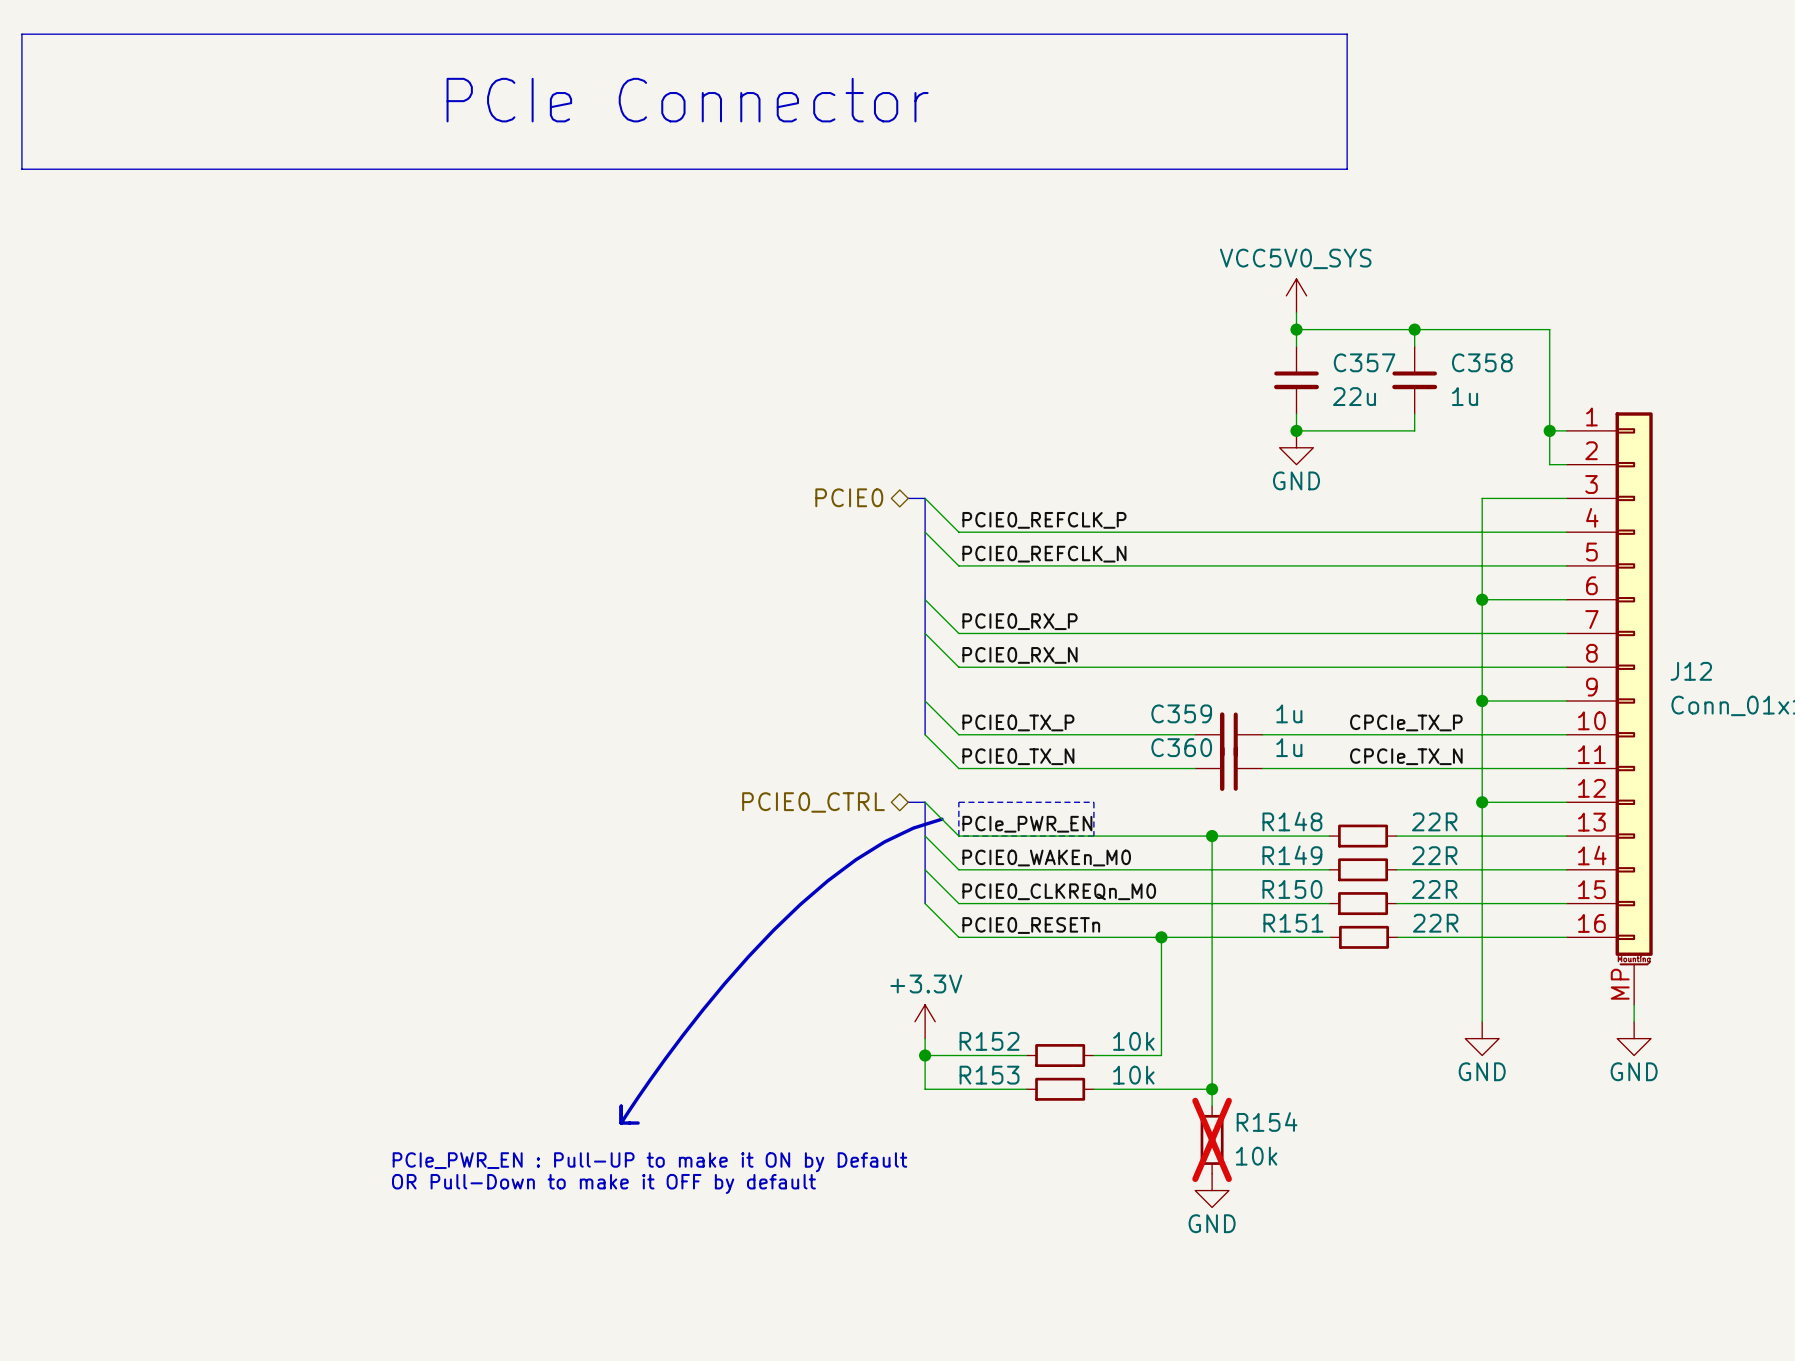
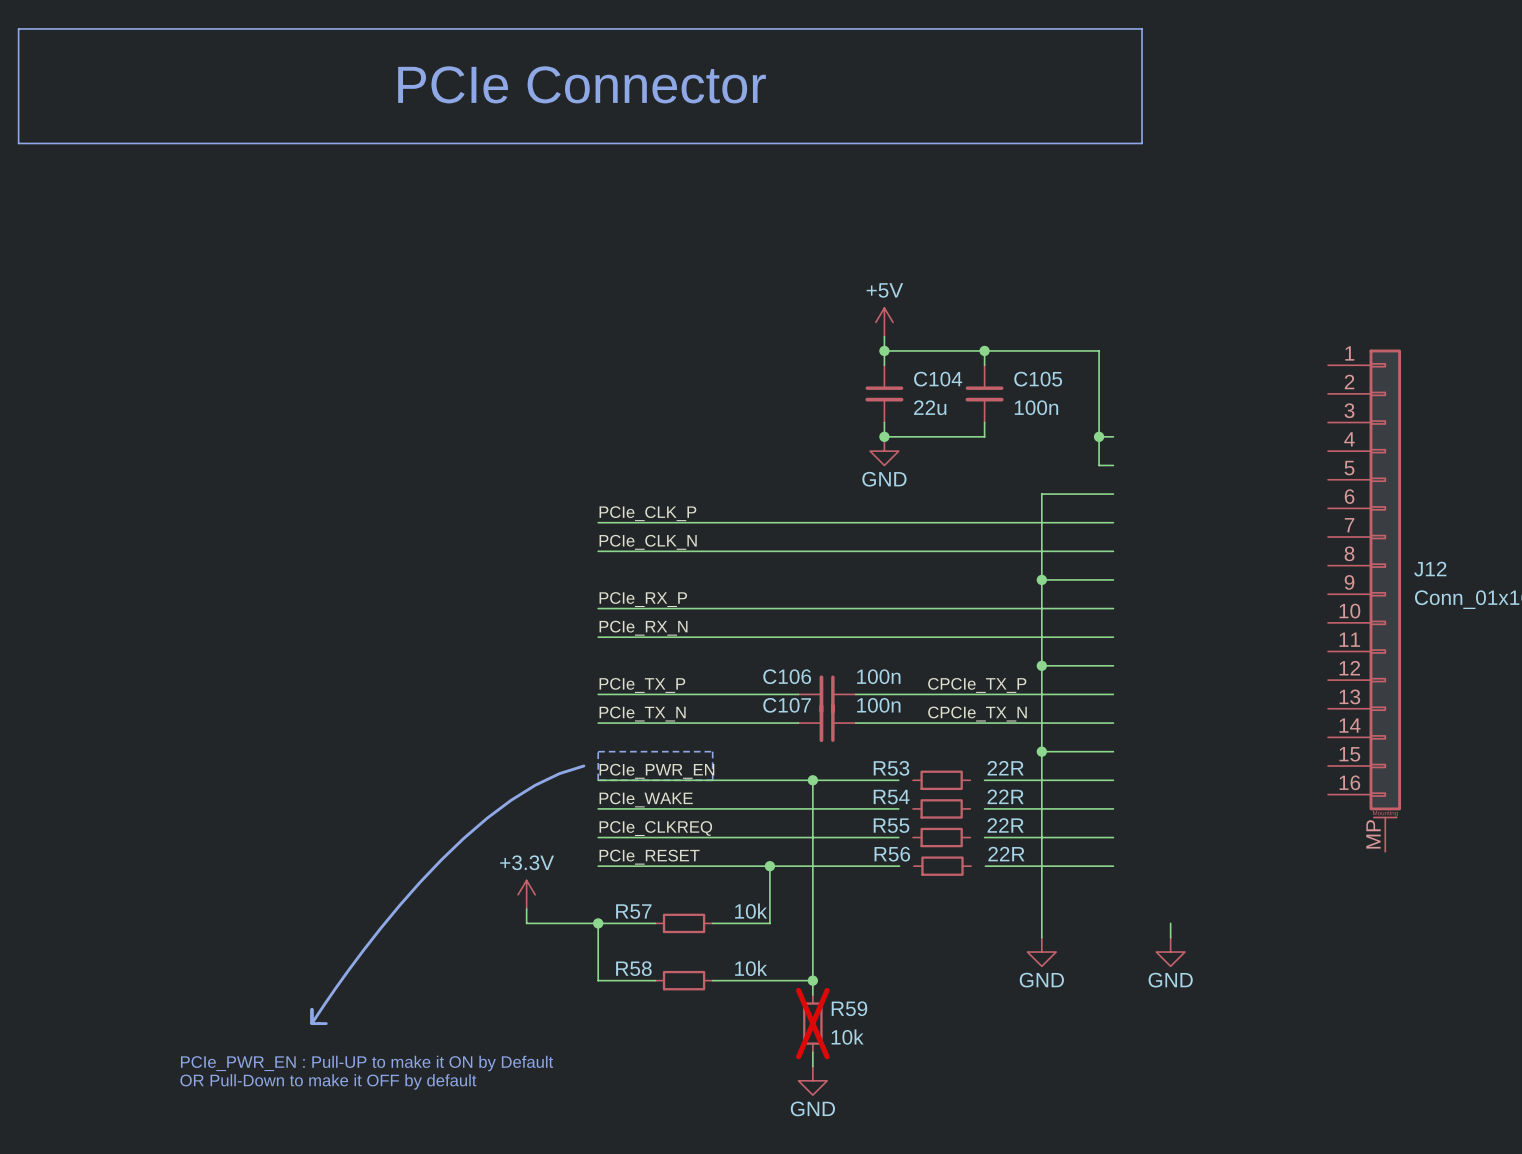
power symbol: VCC5V0_SYS (1296, 295) -> none
wire: (1296, 312) (1296, 346) -> (884, 336) (884, 365)
wire: (1296, 329) (1549, 329) (1549, 464) (1566, 464) -> none
junction: (1296, 329) -> none
wire: (1414, 329) (1414, 346) -> (984, 350) (984, 365)
junction: (1414, 329) -> none
power symbol: none -> +5V (884, 322)
C357: 22u (1296, 380) -> none
C358: 1u (1414, 380) -> none
wire: none -> (884, 350) (1099, 350)
junction: none -> (884, 350)
junction: none -> (984, 350)
wire: (1414, 414) (1414, 430) (1296, 430) -> (1113, 465) (1099, 465) (1099, 365)
junction: (1296, 430) -> none
wire: (1549, 430) (1566, 430) -> (1099, 436) (1113, 436)
junction: (1549, 430) -> none
power symbol position: GND (1296, 447) -> GND (884, 451)
C104: none -> 22u (884, 393)
C105: none -> 100n (984, 393)
hierarchical label: PCIE0 (849, 497) -> none
bus: (908, 498) (925, 498) (925, 734) -> none
wire: (925, 498) (958, 532) (1566, 532) -> none
wire: none -> (884, 422) (884, 436) (984, 436) (984, 422)
wire: (1566, 498) (1482, 498) (1482, 1021) -> (1113, 494) (1041, 494) (1041, 937)
junction: none -> (884, 436)
junction: none -> (1099, 436)
label: PCIE0_REFCLK_P (1044, 520) -> none
wire: (925, 532) (958, 565) (1566, 565) -> none
label: PCIE0_REFCLK_N (1044, 554) -> none
wire: (925, 599) (958, 633) (1566, 633) -> none
wire: (1482, 599) (1566, 599) -> (1041, 579) (1113, 579)
junction: (1482, 599) -> none
label: none -> PCIe_CLK_P (647, 513)
wire: none -> (598, 522) (1113, 522)
label: PCIE0_RX_P (1020, 621) -> none
wire: (925, 633) (958, 667) (1566, 667) -> none
label: none -> PCIe_CLK_N (648, 542)
wire: none -> (598, 551) (1113, 551)
label: PCIE0_RX_N (1020, 655) -> none
junction: none -> (1041, 579)
wire: (925, 701) (958, 734) (1195, 734) -> none
wire: (1482, 701) (1566, 701) -> (1041, 665) (1113, 665)
junction: (1482, 701) -> none
label: none -> PCIe_RX_P (643, 599)
wire: none -> (598, 608) (1113, 608)
label: PCIE0_TX_P (1018, 722) -> none
label position: CPCIe_TX_P (1406, 722) -> CPCIe_TX_P (977, 685)
wire: (925, 734) (958, 768) (1195, 768) -> none
C359: 1u (1228, 734) -> none
wire: (1262, 734) (1566, 734) -> (855, 694) (1113, 694)
label: none -> PCIe_RX_N (643, 628)
wire: none -> (598, 637) (1113, 637)
label: PCIE0_TX_N (1018, 756) -> none
label position: CPCIe_TX_N (1406, 756) -> CPCIe_TX_N (977, 714)
C360: 1u (1228, 768) -> none
wire: (1262, 768) (1566, 768) -> (855, 723) (1113, 723)
junction: none -> (1041, 665)
hierarchical label: PCIE0_CTRL (813, 802) -> none
bus: (908, 802) (925, 802) (925, 903) -> none
wire: (925, 802) (958, 836) (1329, 836) -> none
line: (958, 802) (1093, 802) (1093, 836) (958, 836) (958, 802) -> (598, 751) (712, 751) (712, 780) (598, 780) (598, 751)
wire: (1482, 802) (1566, 802) -> (1041, 751) (1113, 751)
junction: (1482, 802) -> none
label: none -> PCIe_TX_P (642, 685)
wire: none -> (598, 694) (798, 694)
line: (941, 819) (913, 828) (884, 841) (855, 859) (800, 904) (748, 956) (702, 1010) (665, 1059) (621, 1123) -> (583, 765) (559, 773) (535, 785) (510, 800) (463, 838) (419, 882) (380, 928) (349, 969) (311, 1023)
C106: none -> 100n (827, 694)
label position: PCIe_PWR_EN (1027, 824) -> PCIe_PWR_EN (656, 771)
wire: (925, 836) (958, 869) (1329, 869) -> none
wire: (1212, 836) (1212, 1106) -> none
junction: (1212, 836) -> none
R148: 22R (1363, 836) -> none
wire: (1396, 836) (1566, 836) -> none
label: none -> PCIe_TX_N (642, 714)
wire: none -> (598, 723) (798, 723)
C107: none -> 100n (827, 723)
label: PCIE0_WAKEn_M0 (1046, 858) -> none
wire: (925, 869) (958, 903) (1329, 903) -> none
R149: 22R (1363, 869) -> none
wire: (1396, 869) (1566, 869) -> none
junction: none -> (1041, 751)
label: PCIE0_CLKREQn_M0 (1059, 891) -> none
wire: (925, 903) (958, 937) (1330, 937) -> none
R150: 22R (1363, 903) -> none
wire: (1396, 903) (1566, 903) -> none
wire: none -> (598, 780) (898, 780)
wire: none -> (812, 780) (812, 994)
junction: none -> (812, 780)
R53: none -> 22R (941, 780)
wire: none -> (984, 780) (1113, 780)
label: PCIE0_RESETn (1031, 925) -> none
wire: (1161, 937) (1161, 1055) (1093, 1055) -> none
junction: (1161, 937) -> none
R151: 22R (1364, 937) -> none
wire: (1397, 937) (1566, 937) -> none
label: none -> PCIe_WAKE (646, 799)
wire: none -> (598, 808) (898, 808)
R54: none -> 22R (941, 808)
wire: none -> (984, 808) (1113, 808)
label: none -> PCIe_CLKREQ (655, 828)
wire: none -> (598, 837) (898, 837)
R55: none -> 22R (941, 837)
wire: none -> (984, 837) (1113, 837)
wire: (1634, 1004) (1634, 1021) -> (1170, 923) (1170, 937)
label: none -> PCIe_RESET (649, 857)
wire: none -> (598, 866) (899, 866)
wire: none -> (769, 866) (769, 923) (712, 923)
power symbol position: +3.3V (925, 1021) -> +3.3V (526, 894)
R56: none -> 22R (942, 866)
wire: none -> (985, 866) (1113, 866)
wire: (925, 1038) (925, 1089) (1026, 1089) -> none
power symbol: GND (1482, 1038) -> none
power symbol: GND (1634, 1038) -> none
wire: (925, 1055) (1026, 1055) -> none
junction position: (925, 1055) -> (769, 866)
R152: 10k (1060, 1055) -> none
wire: none -> (526, 909) (526, 923) (655, 923)
wire: none -> (598, 923) (598, 980) (655, 980)
junction: none -> (598, 923)
R57: none -> 10k (684, 923)
R153: 10k (1060, 1089) -> none
wire: (1093, 1089) (1212, 1089) -> (712, 980) (812, 980)
junction: (1212, 1089) -> none
line: (621, 1106) (621, 1123) -> (311, 1009) (311, 1023)
line: (621, 1123) (638, 1123) -> (311, 1023) (326, 1023)
power symbol: none -> GND (1170, 952)
R154: 10k (1212, 1139) -> none
R58: none -> 10k (684, 980)
junction: none -> (812, 980)
text position: PCIe_PWR_EN : Pull-UP to make it ON by Default (649, 1162) -> PCIe_PWR_EN : Pull-UP to make it ON by Default (367, 1063)
text position: OR Pull-Down to make it OFF by default (603, 1183) -> OR Pull-Down to make it OFF by default (328, 1081)
power symbol position: GND (1212, 1190) -> GND (1041, 952)
R59: none -> 10k (812, 1023)
wire: none -> (812, 1052) (812, 1066)
power symbol: none -> GND (812, 1080)

